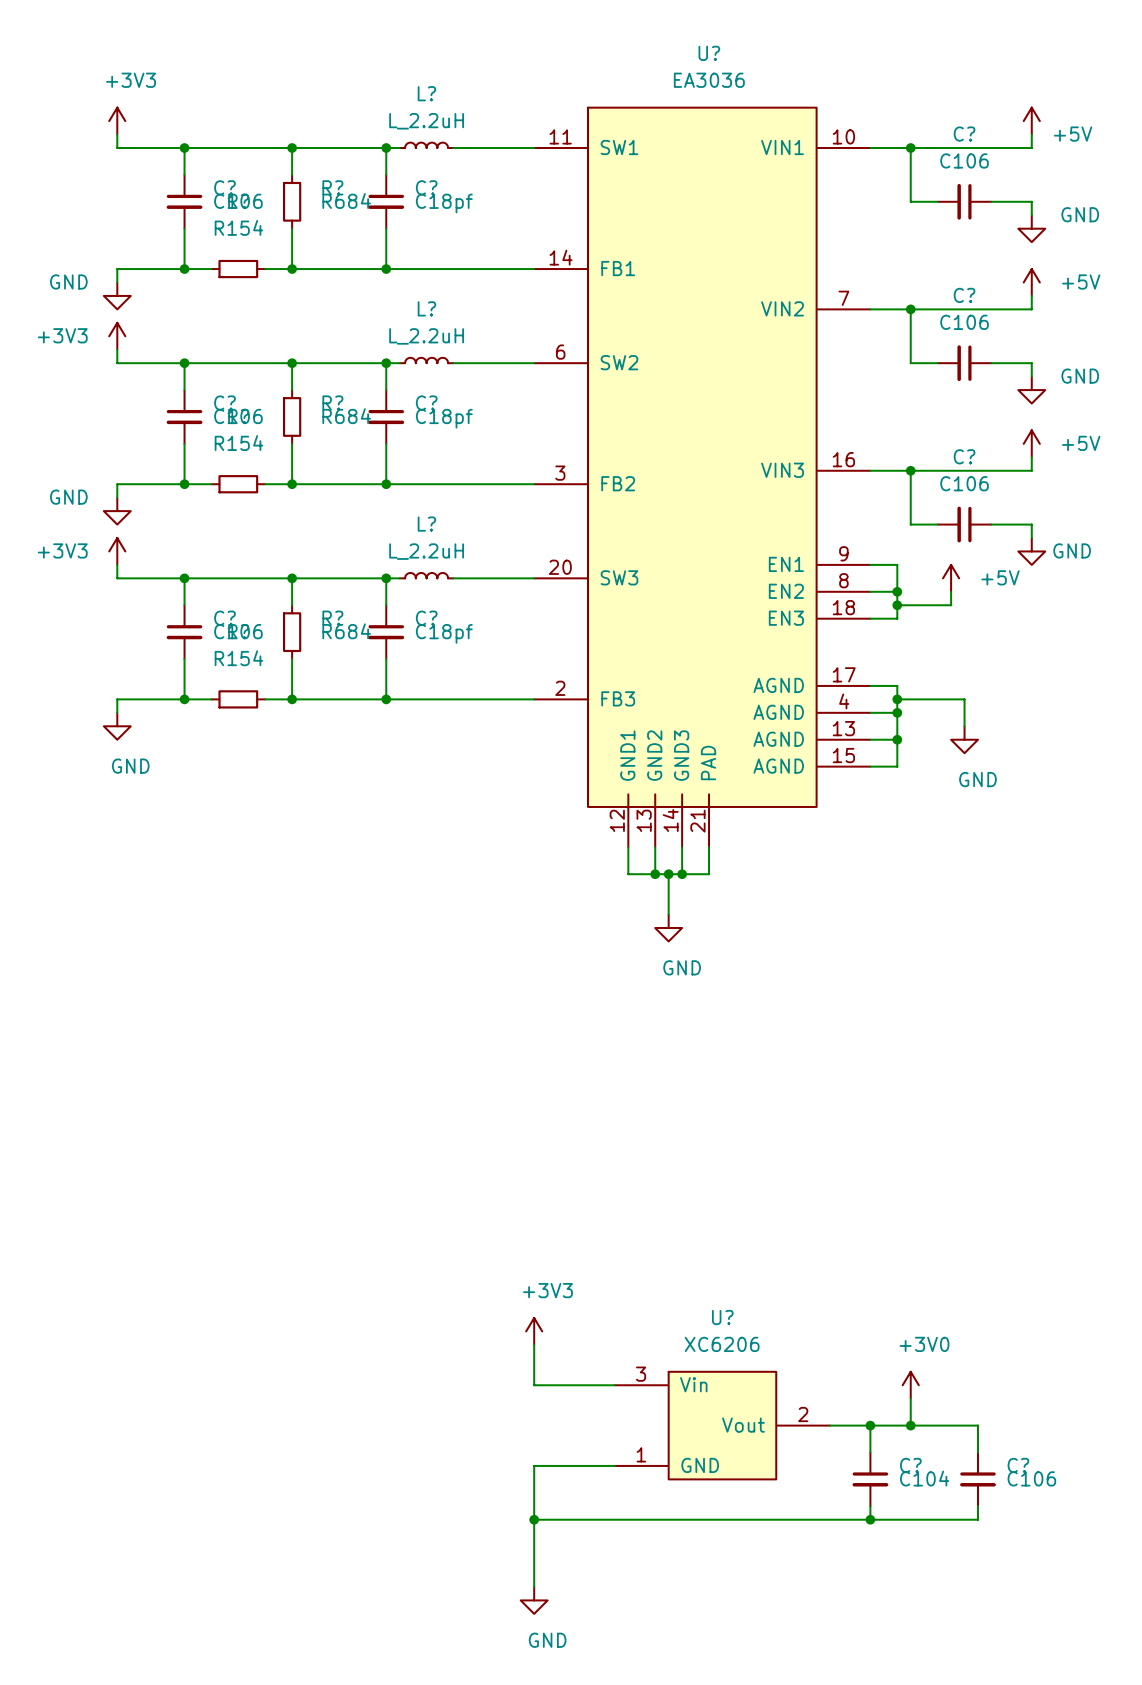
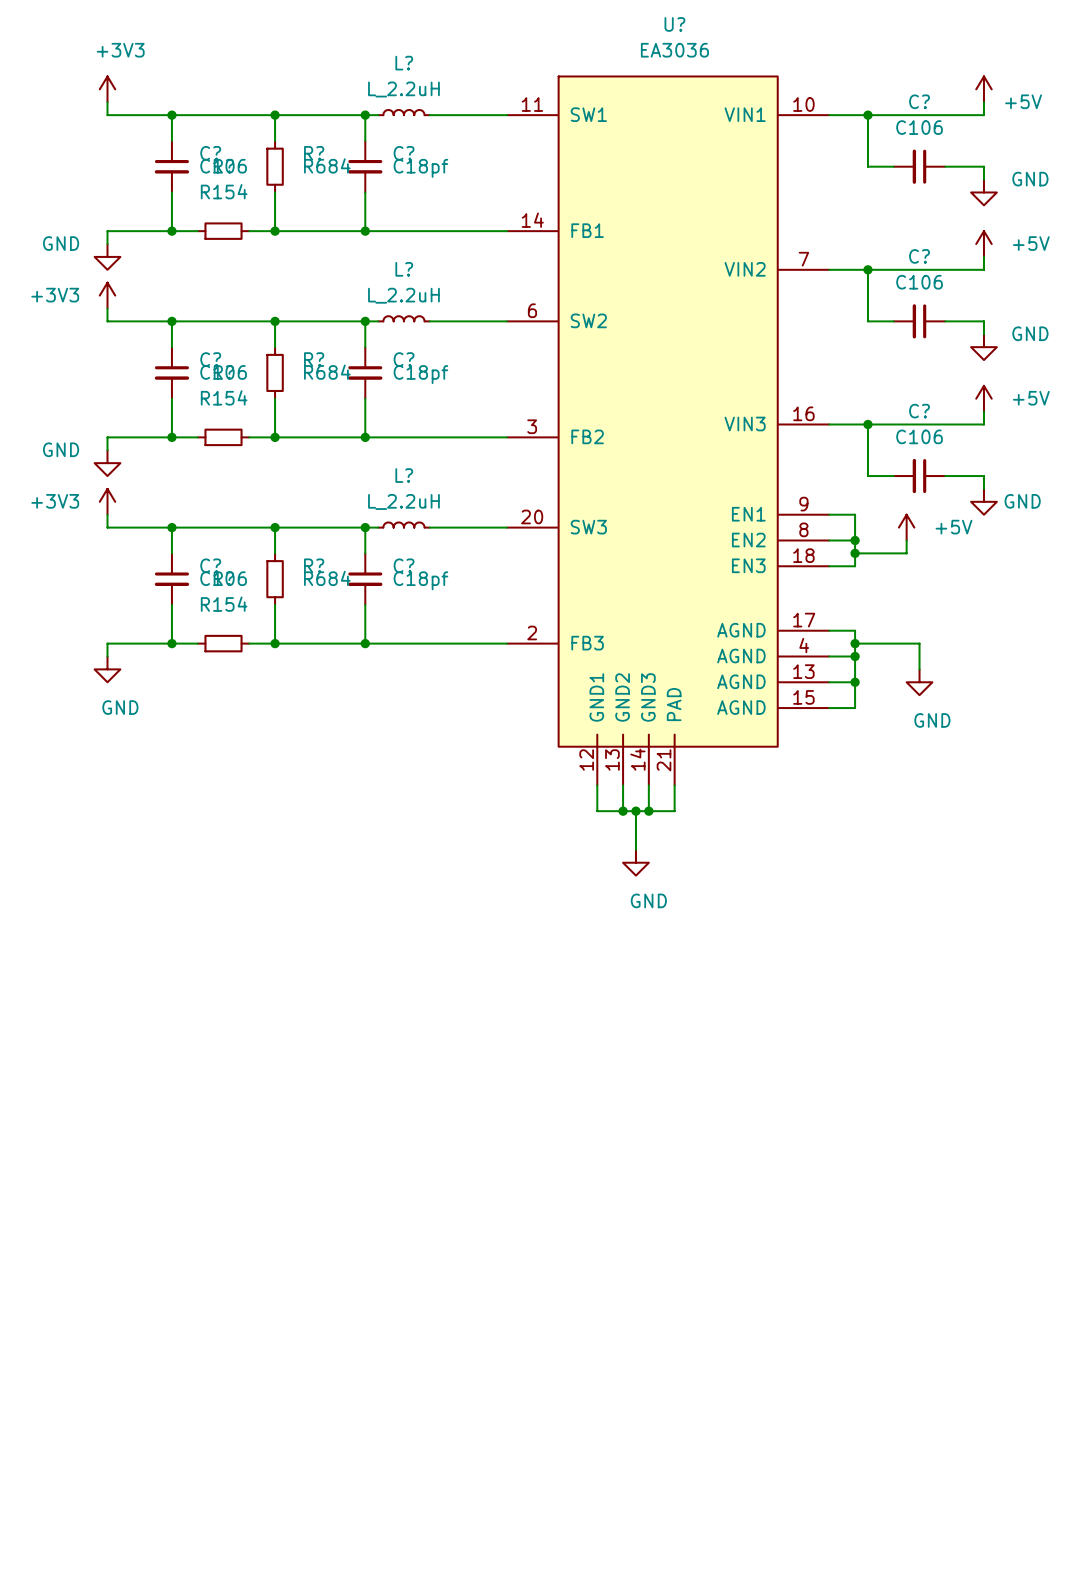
power symbol: +3V3 (534, 1331) -> none
wire: (534, 1344) (534, 1385) (614, 1385) -> none
power symbol: +3V0 (910, 1385) -> none
wire: (910, 1398) (910, 1425) -> none
U?: XC6206 (722, 1425) -> none
wire: (830, 1425) (977, 1425) (977, 1452) -> none
wire: (870, 1425) (870, 1452) -> none
junction: (870, 1425) -> none
junction: (910, 1425) -> none
wire: (614, 1465) (534, 1465) (534, 1586) -> none
C?: C104 (870, 1479) -> none
C?: C106 (977, 1479) -> none
wire: (870, 1506) (870, 1519) -> none
wire: (977, 1506) (977, 1519) (534, 1519) -> none
junction: (534, 1519) -> none
junction: (870, 1519) -> none
power symbol: GND (534, 1600) -> none

